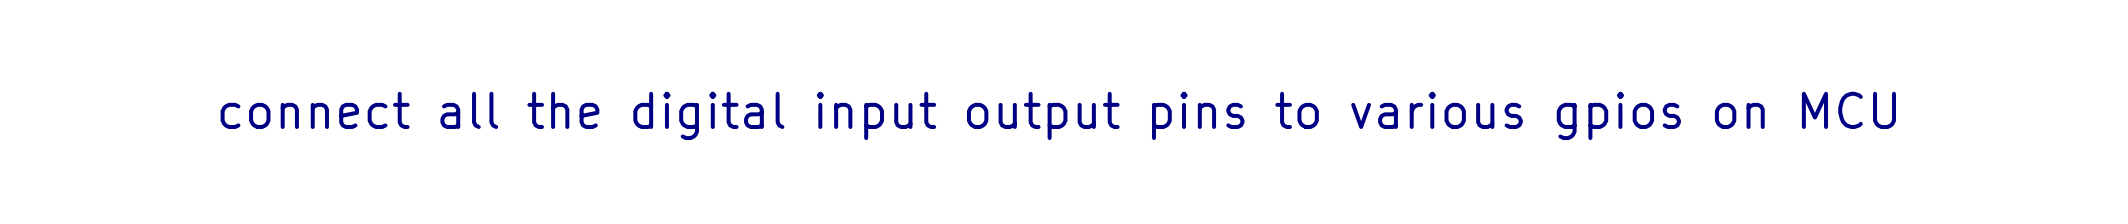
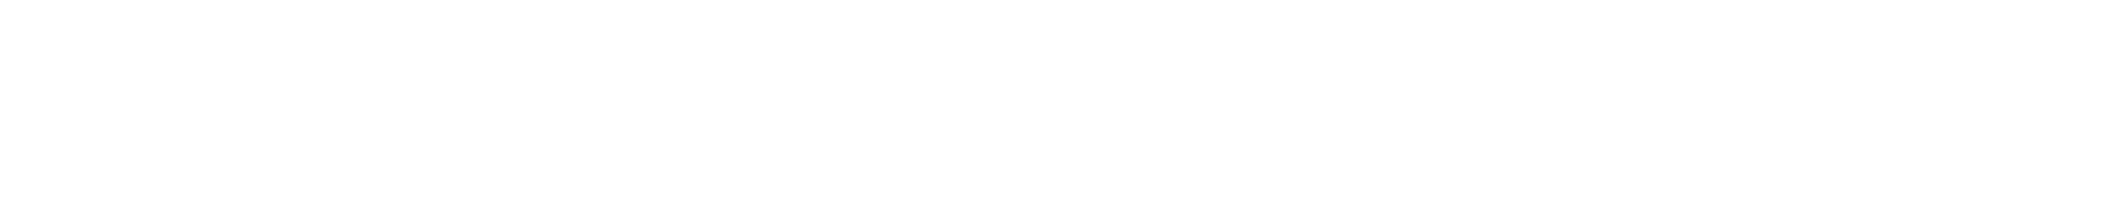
text: connect all the digital input output pins to various gpios on MCU (1058, 115) -> none

